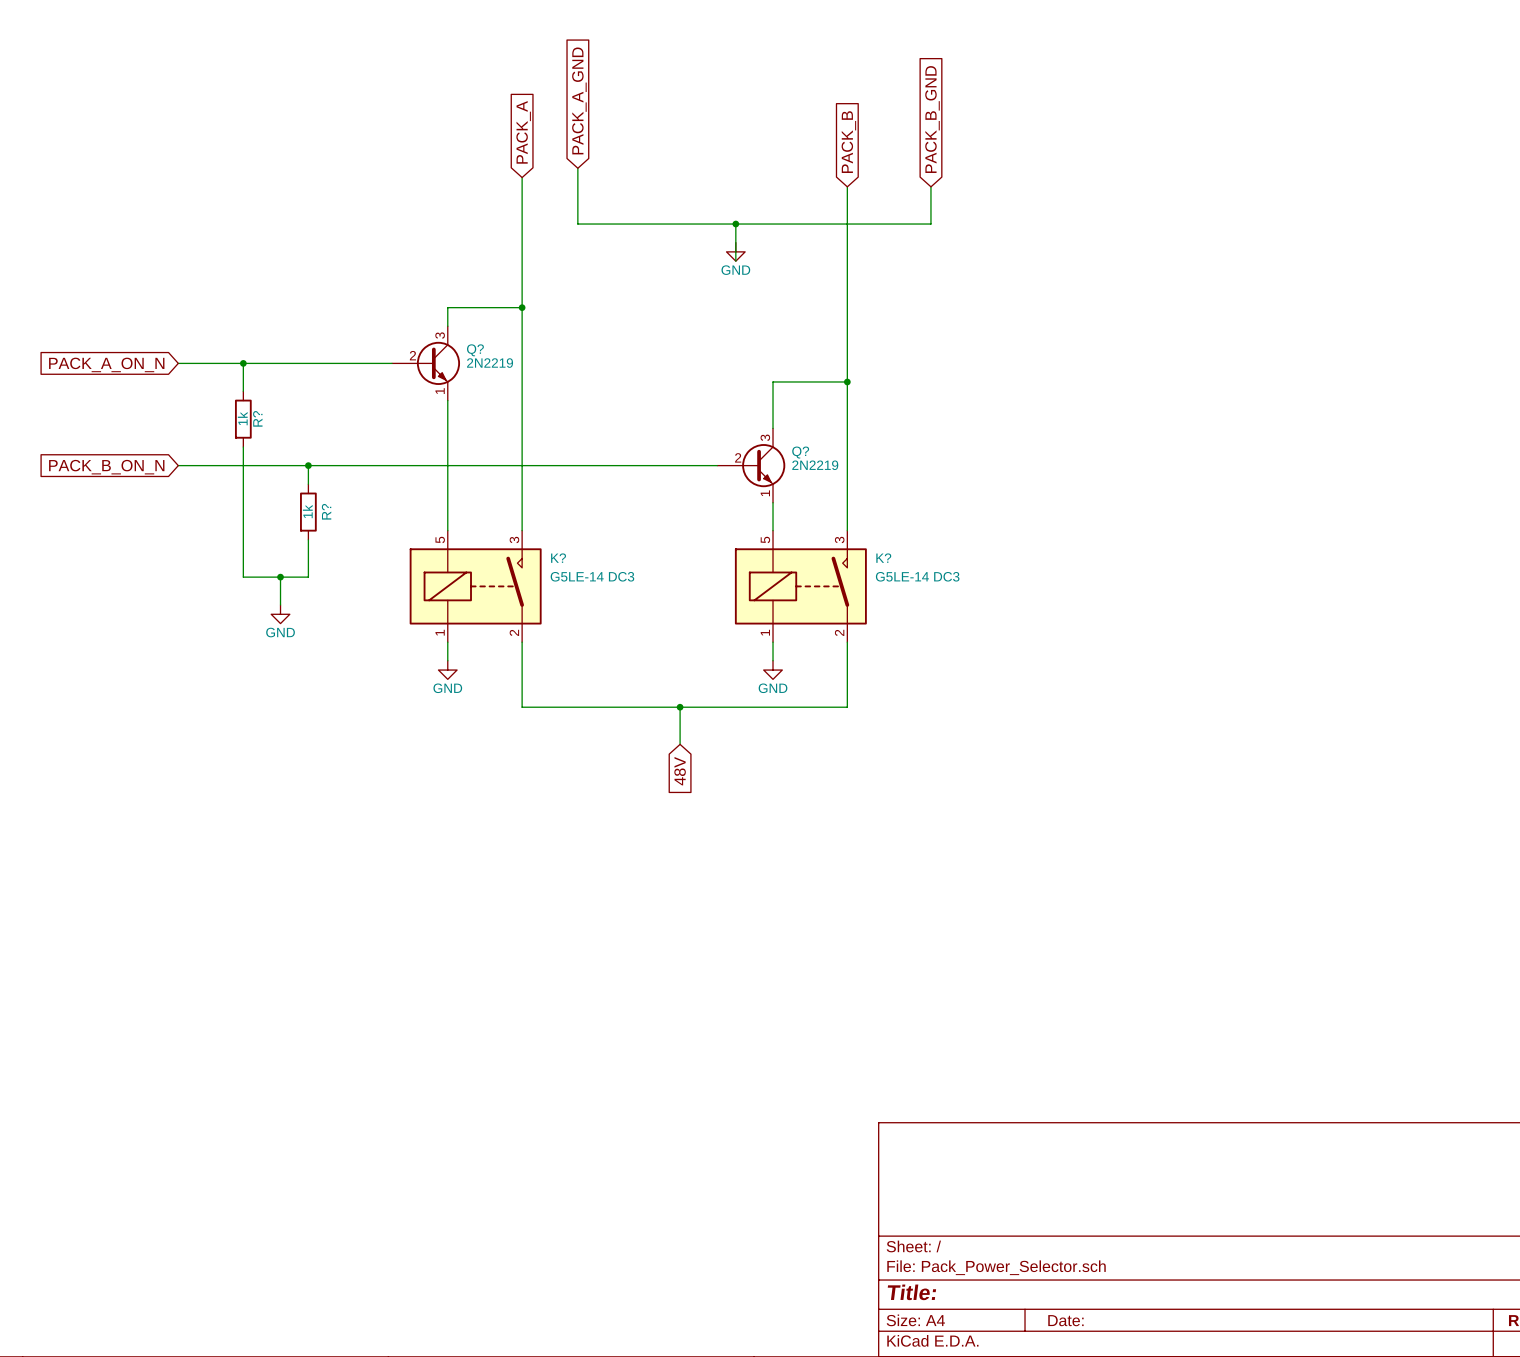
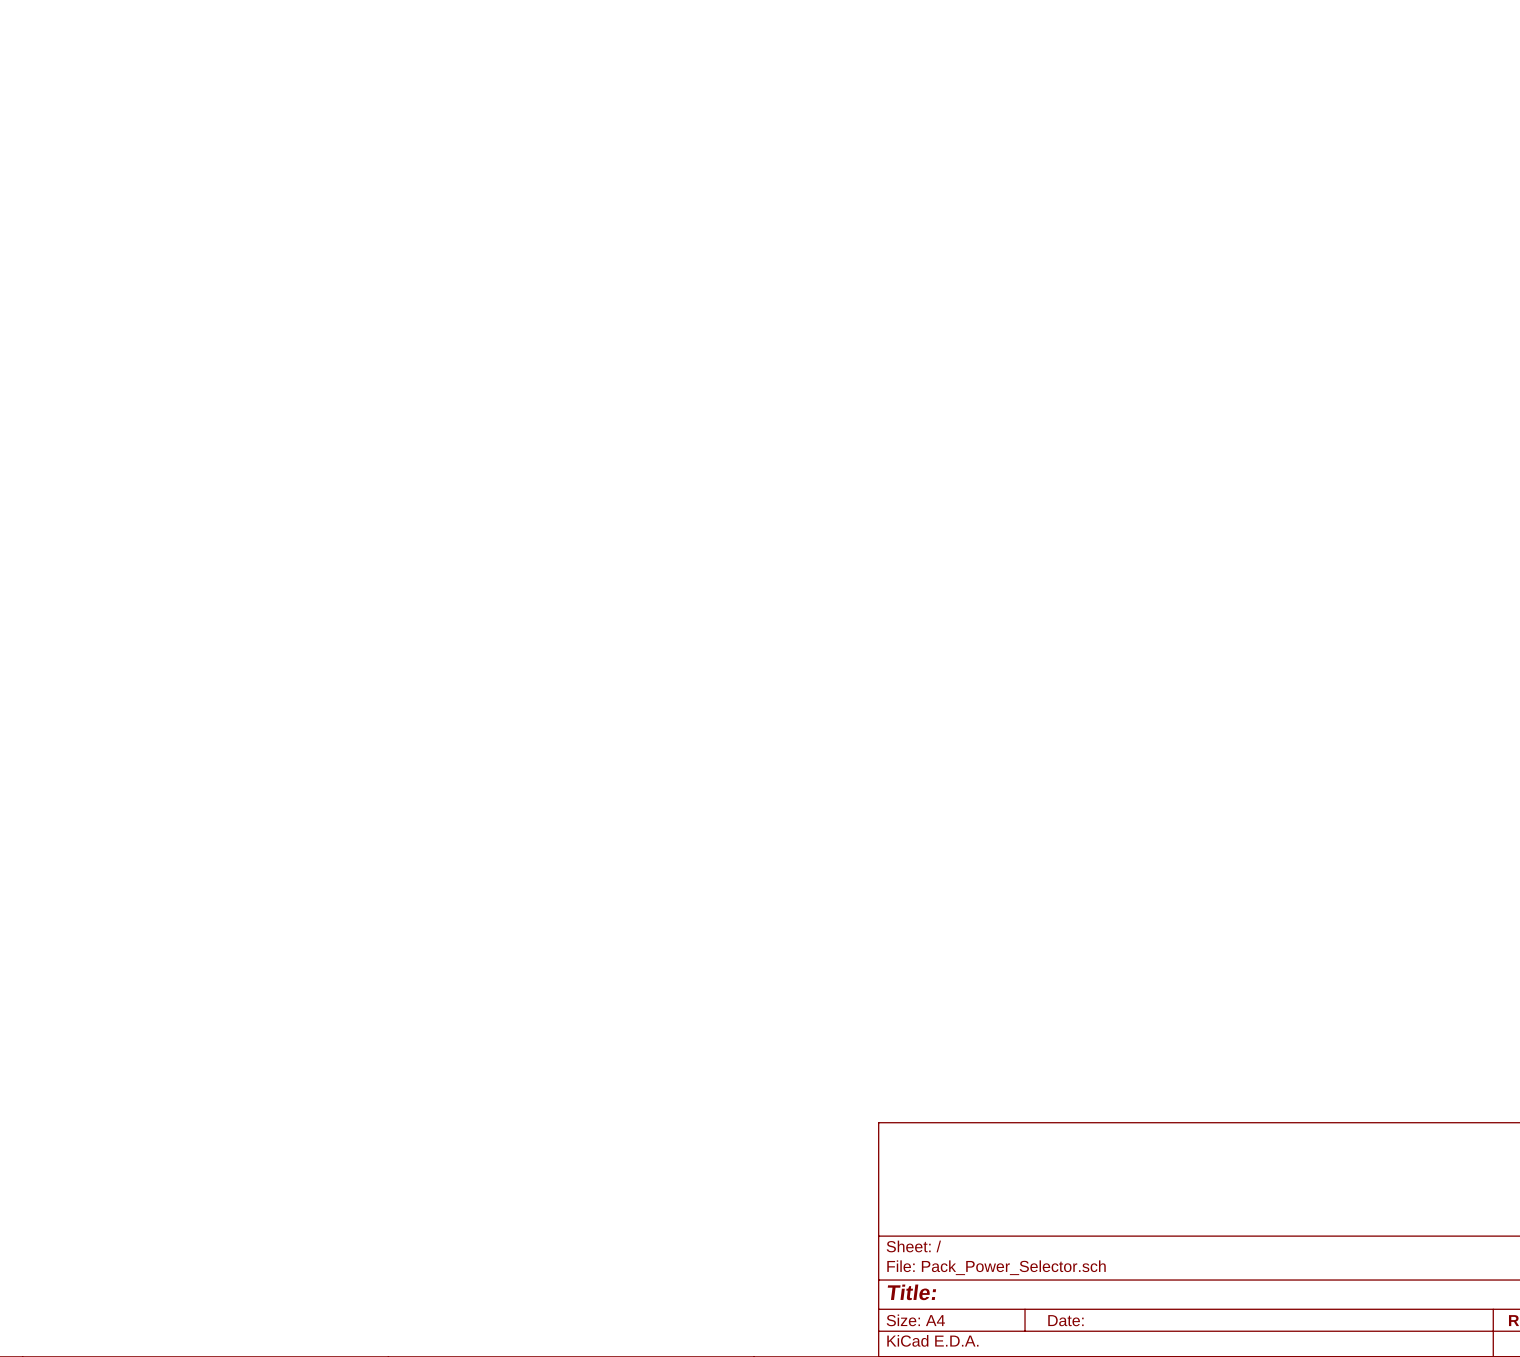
global label: PACK_A_GND (579, 100) -> none
global label: PACK_B_GND (932, 119) -> none
global label: PACK_A (523, 132) -> none
global label: PACK_B (848, 142) -> none
wire: (577, 168) (577, 224) (930, 224) (930, 186) -> none
wire: (522, 177) (522, 530) -> none
wire: (847, 186) (847, 530) -> none
wire: (735, 224) (735, 261) -> none
junction: (735, 224) -> none
power symbol: GND (735, 251) -> none
wire: (522, 307) (447, 307) (447, 326) -> none
junction: (522, 307) -> none
wire: (178, 363) (392, 363) -> none
wire: (243, 363) (243, 391) -> none
junction: (243, 363) -> none
Q?: 2N2219 (426, 363) -> none
global label: PACK_A_ON_N (106, 364) -> none
wire: (847, 381) (773, 381) (773, 428) -> none
junction: (847, 381) -> none
wire: (447, 400) (447, 530) -> none
R?: 1k (243, 419) -> none
wire: (243, 447) (243, 577) (308, 577) (308, 539) -> none
wire: (178, 465) (717, 465) -> none
wire: (308, 465) (308, 484) -> none
junction: (308, 465) -> none
Q?: 2N2219 (751, 465) -> none
global label: PACK_B_ON_N (106, 467) -> none
wire: (773, 502) (773, 530) -> none
R?: 1k (308, 512) -> none
wire: (280, 577) (280, 605) -> none
junction: (280, 577) -> none
K?: G5LE-14 DC3 (475, 586) -> none
K?: G5LE-14 DC3 (800, 586) -> none
power symbol: GND (280, 614) -> none
wire: (447, 642) (447, 660) -> none
wire: (522, 642) (522, 707) (847, 707) (847, 642) -> none
wire: (773, 642) (773, 660) -> none
power symbol: GND (447, 670) -> none
power symbol: GND (773, 670) -> none
wire: (680, 707) (680, 744) -> none
junction: (680, 707) -> none
global label: 48V (680, 771) -> none

